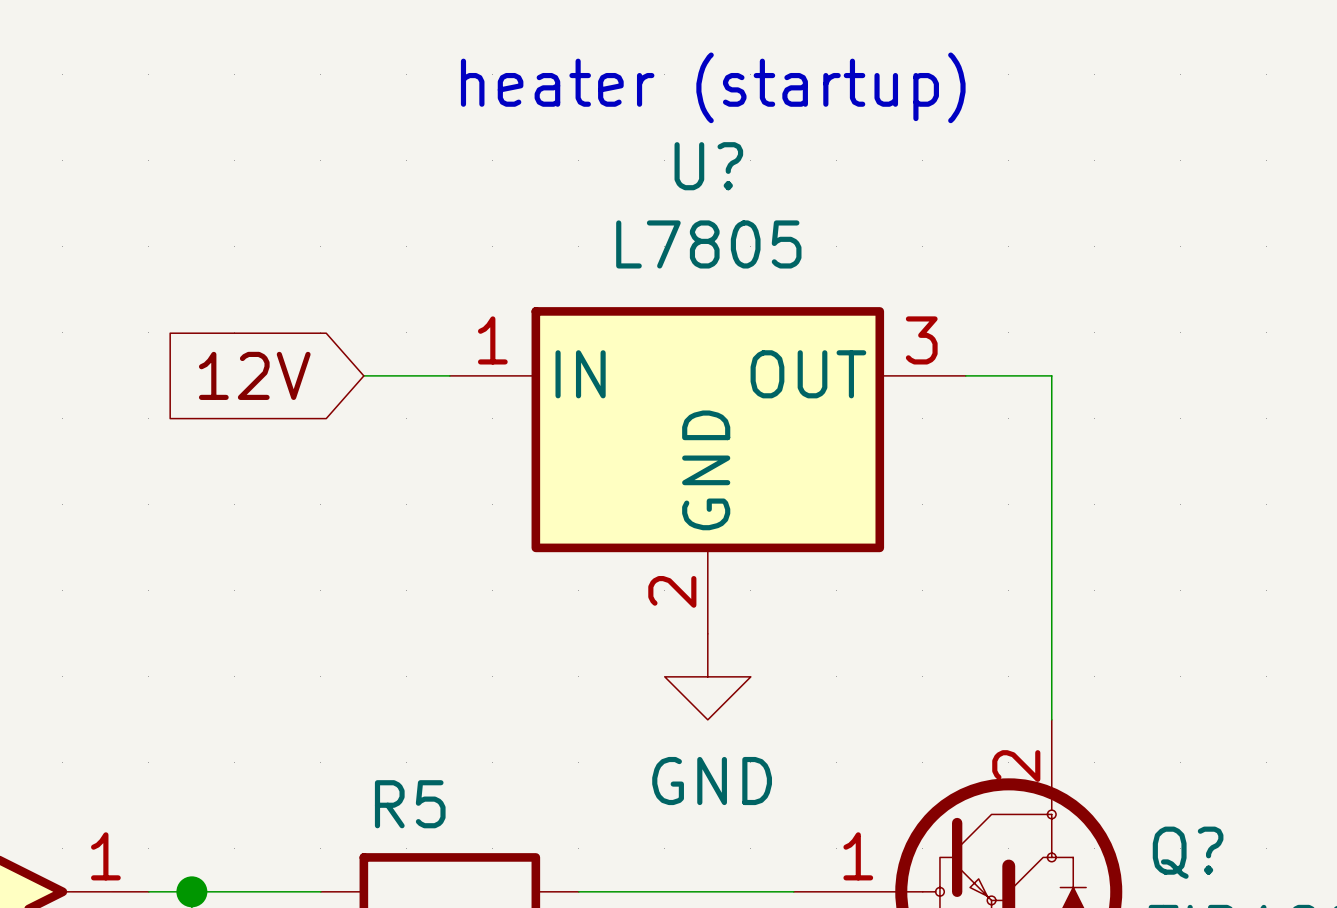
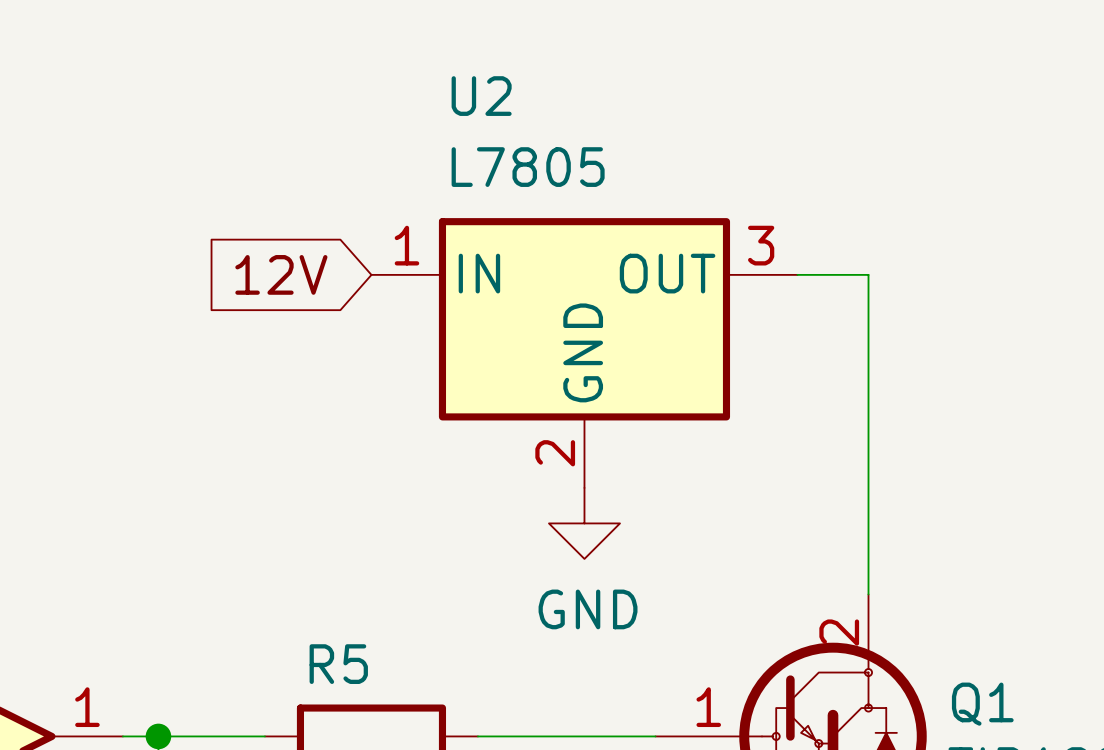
text: heater (startup) (713, 87) -> none
global label position: 12V (254, 375) -> 12V (281, 274)
wire: (363, 375) (449, 375) -> none
wire: (965, 375) (1051, 375) -> (797, 274) (868, 274) (868, 310)
U2: none -> L7805 (584, 353)
U?: L7805 (707, 470) -> none
power symbol position: GND (707, 676) -> GND (584, 523)
Q? name: Q? (1188, 852) -> Q1 (982, 704)

